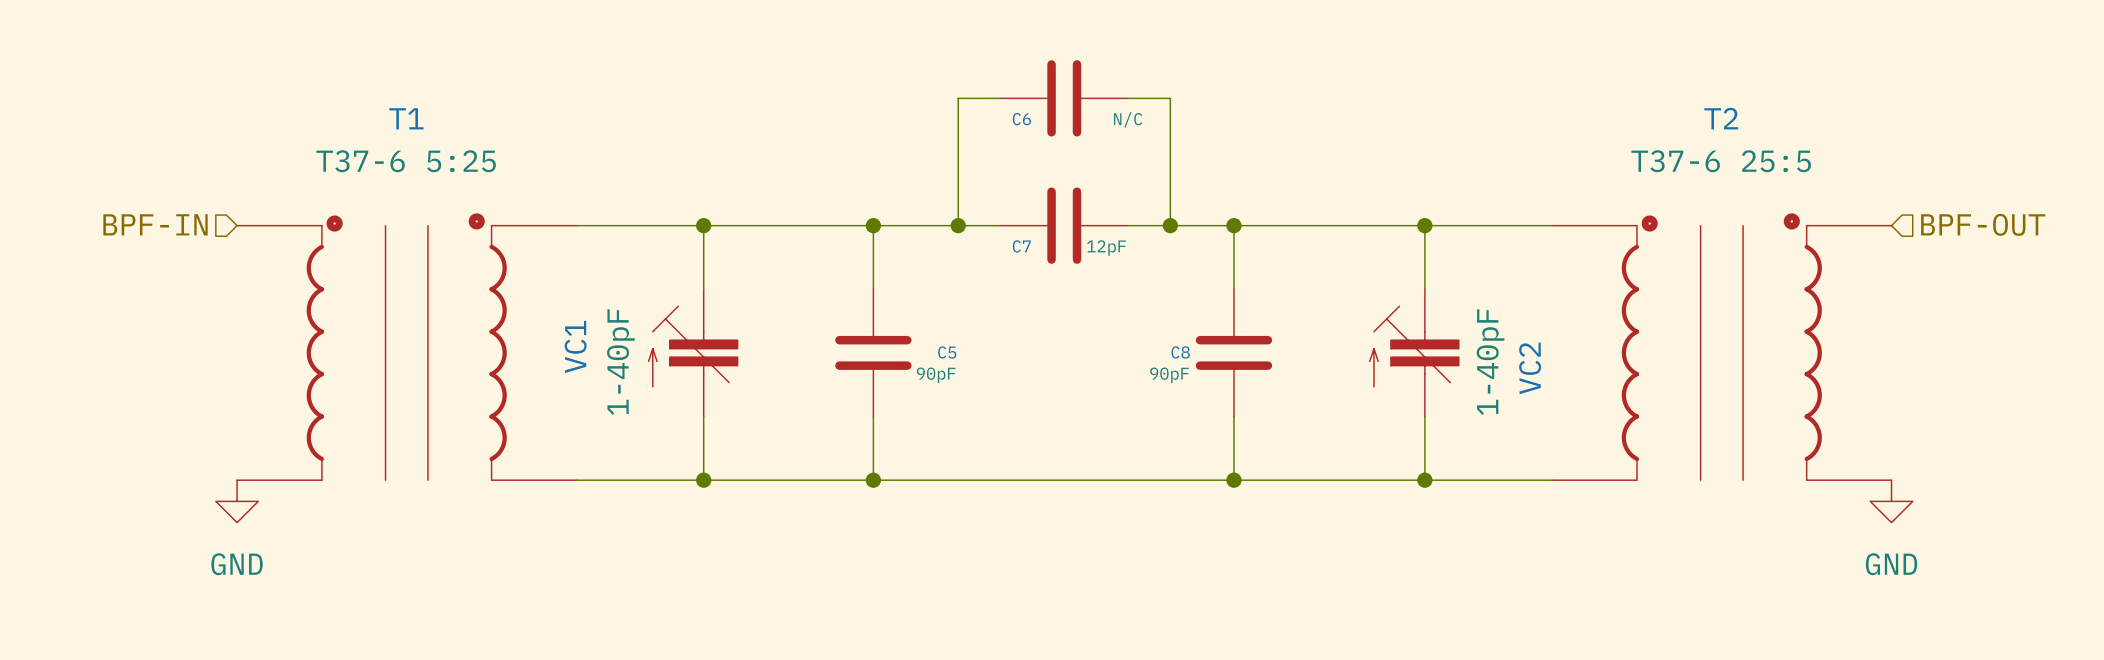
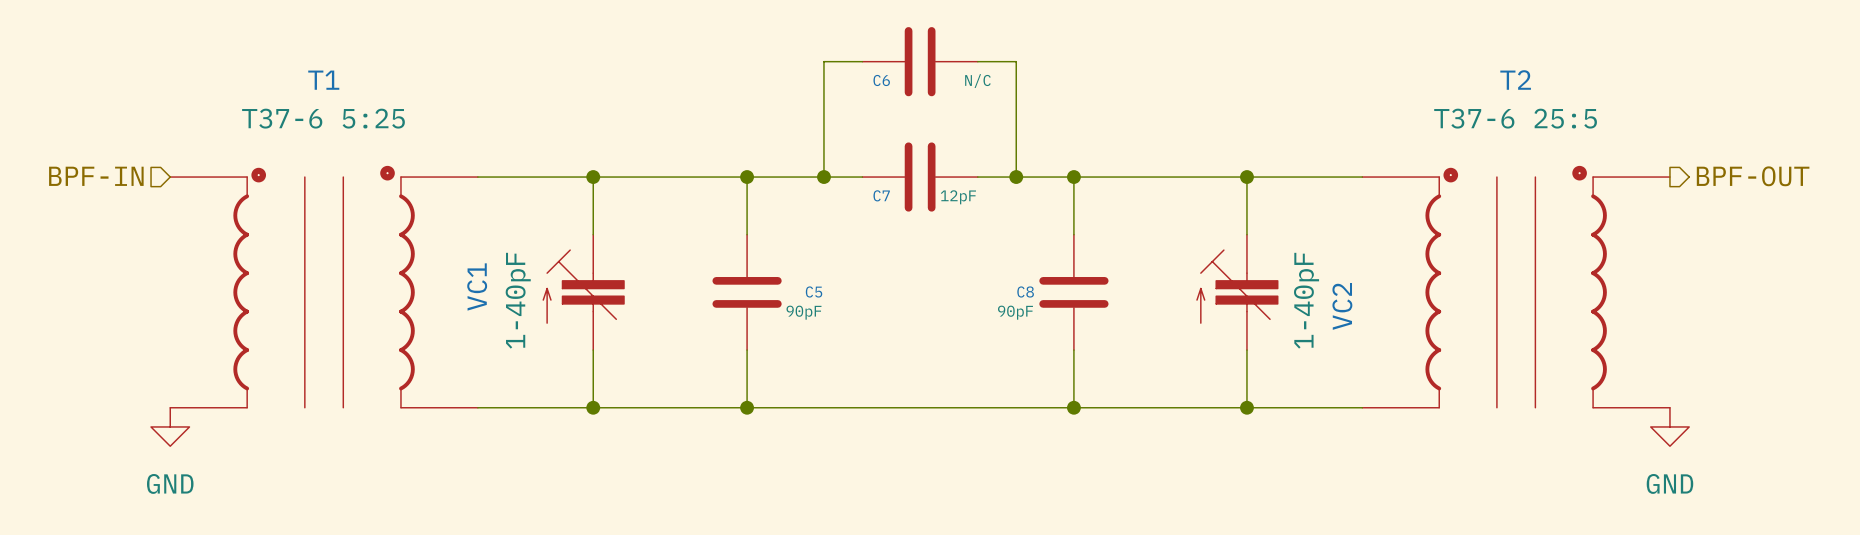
hierarchical label shape: input (1983, 224) -> output (1753, 176)

